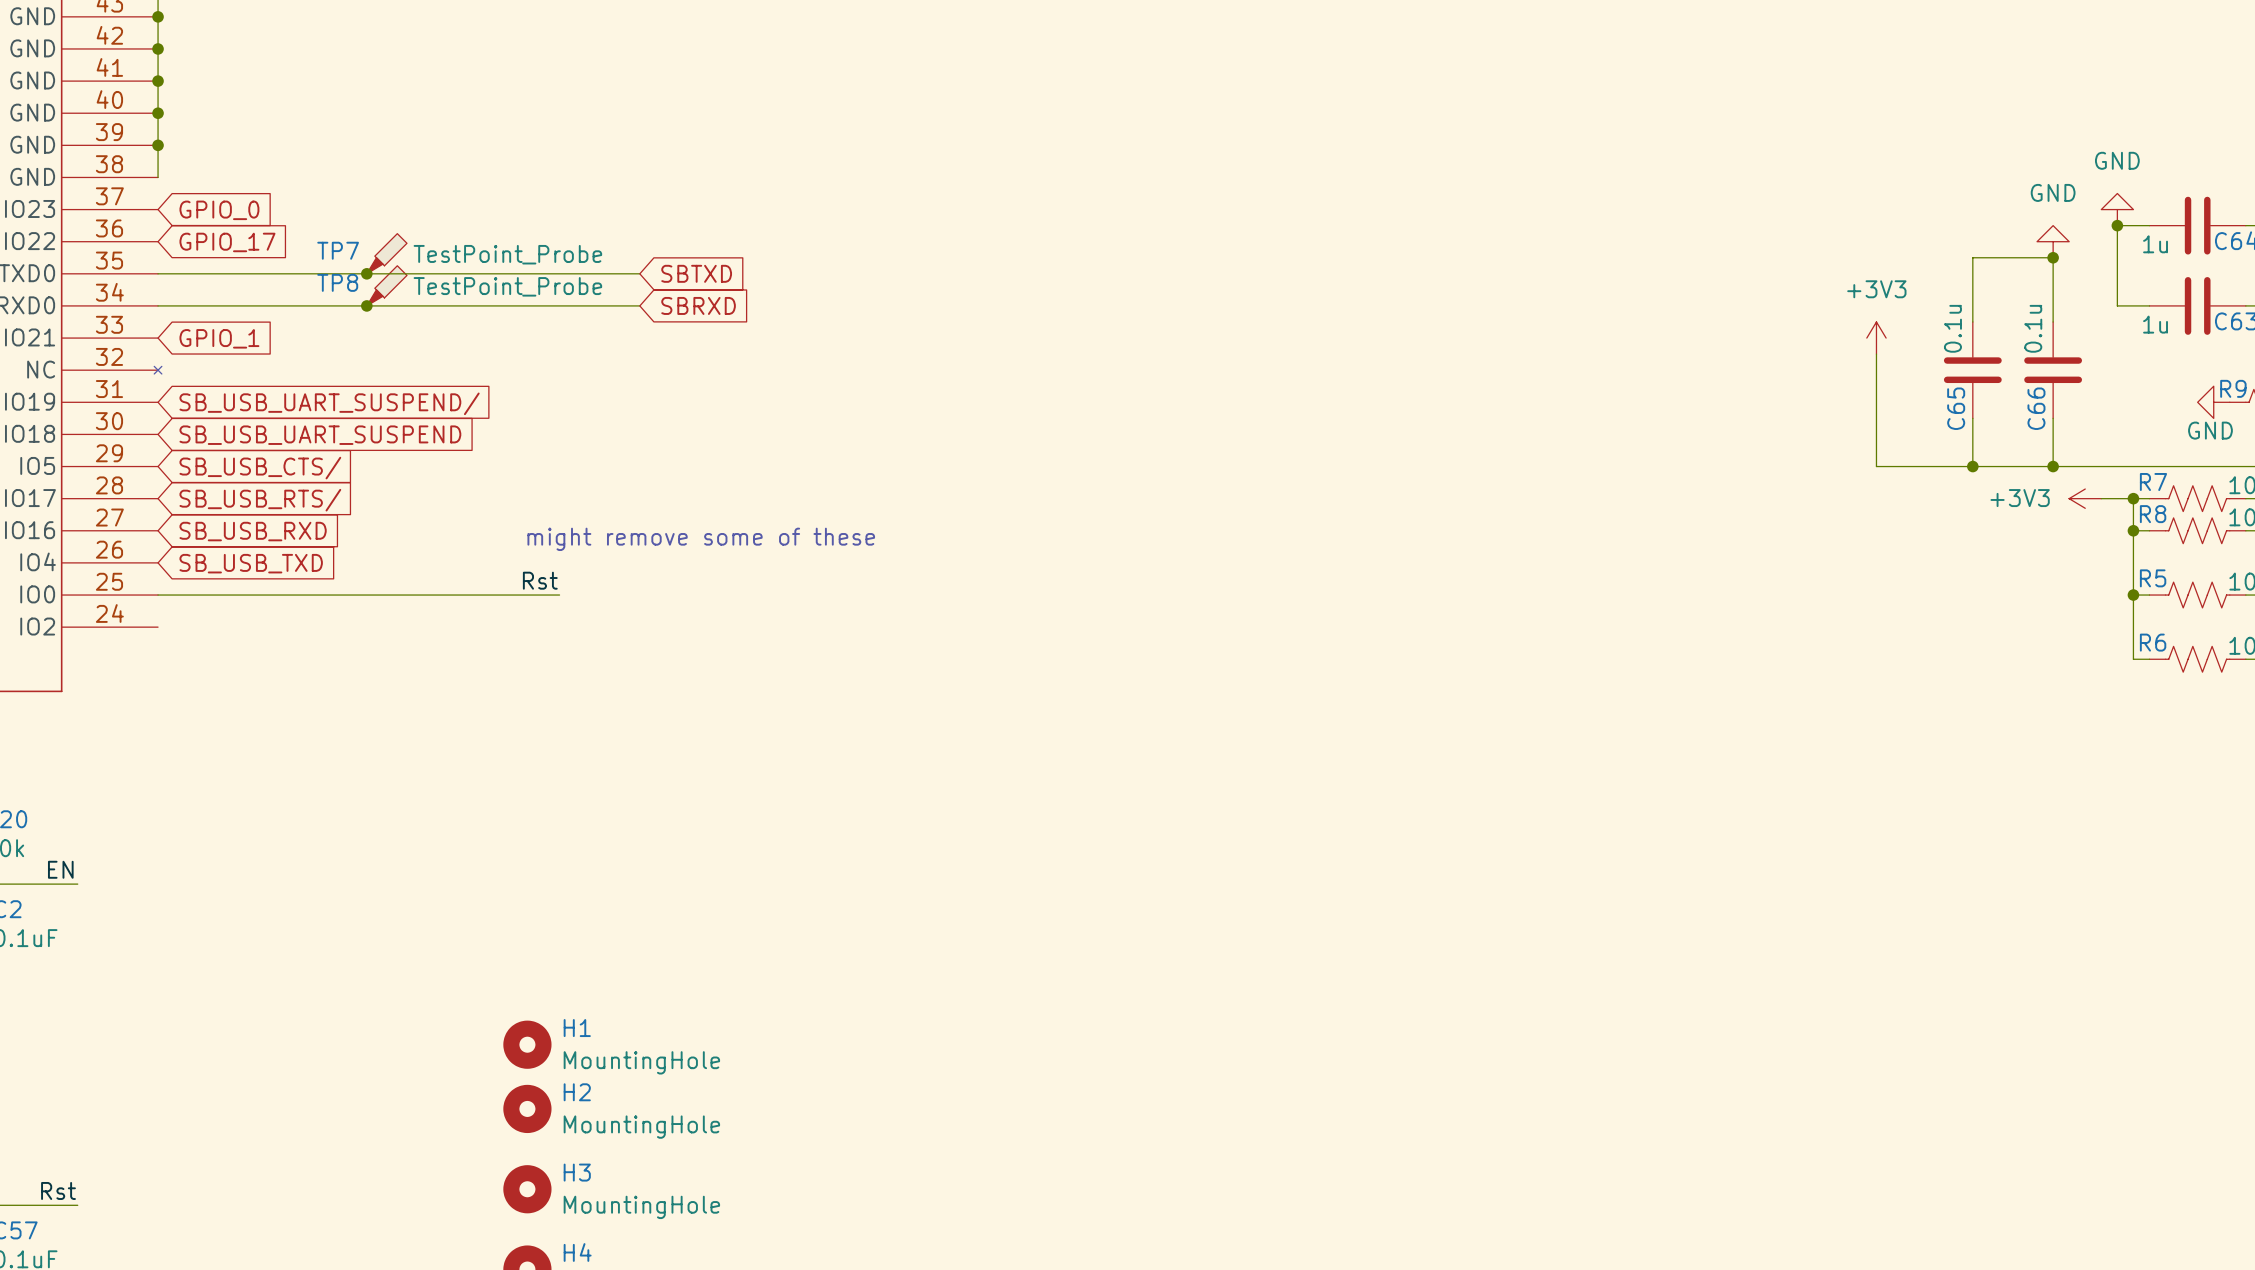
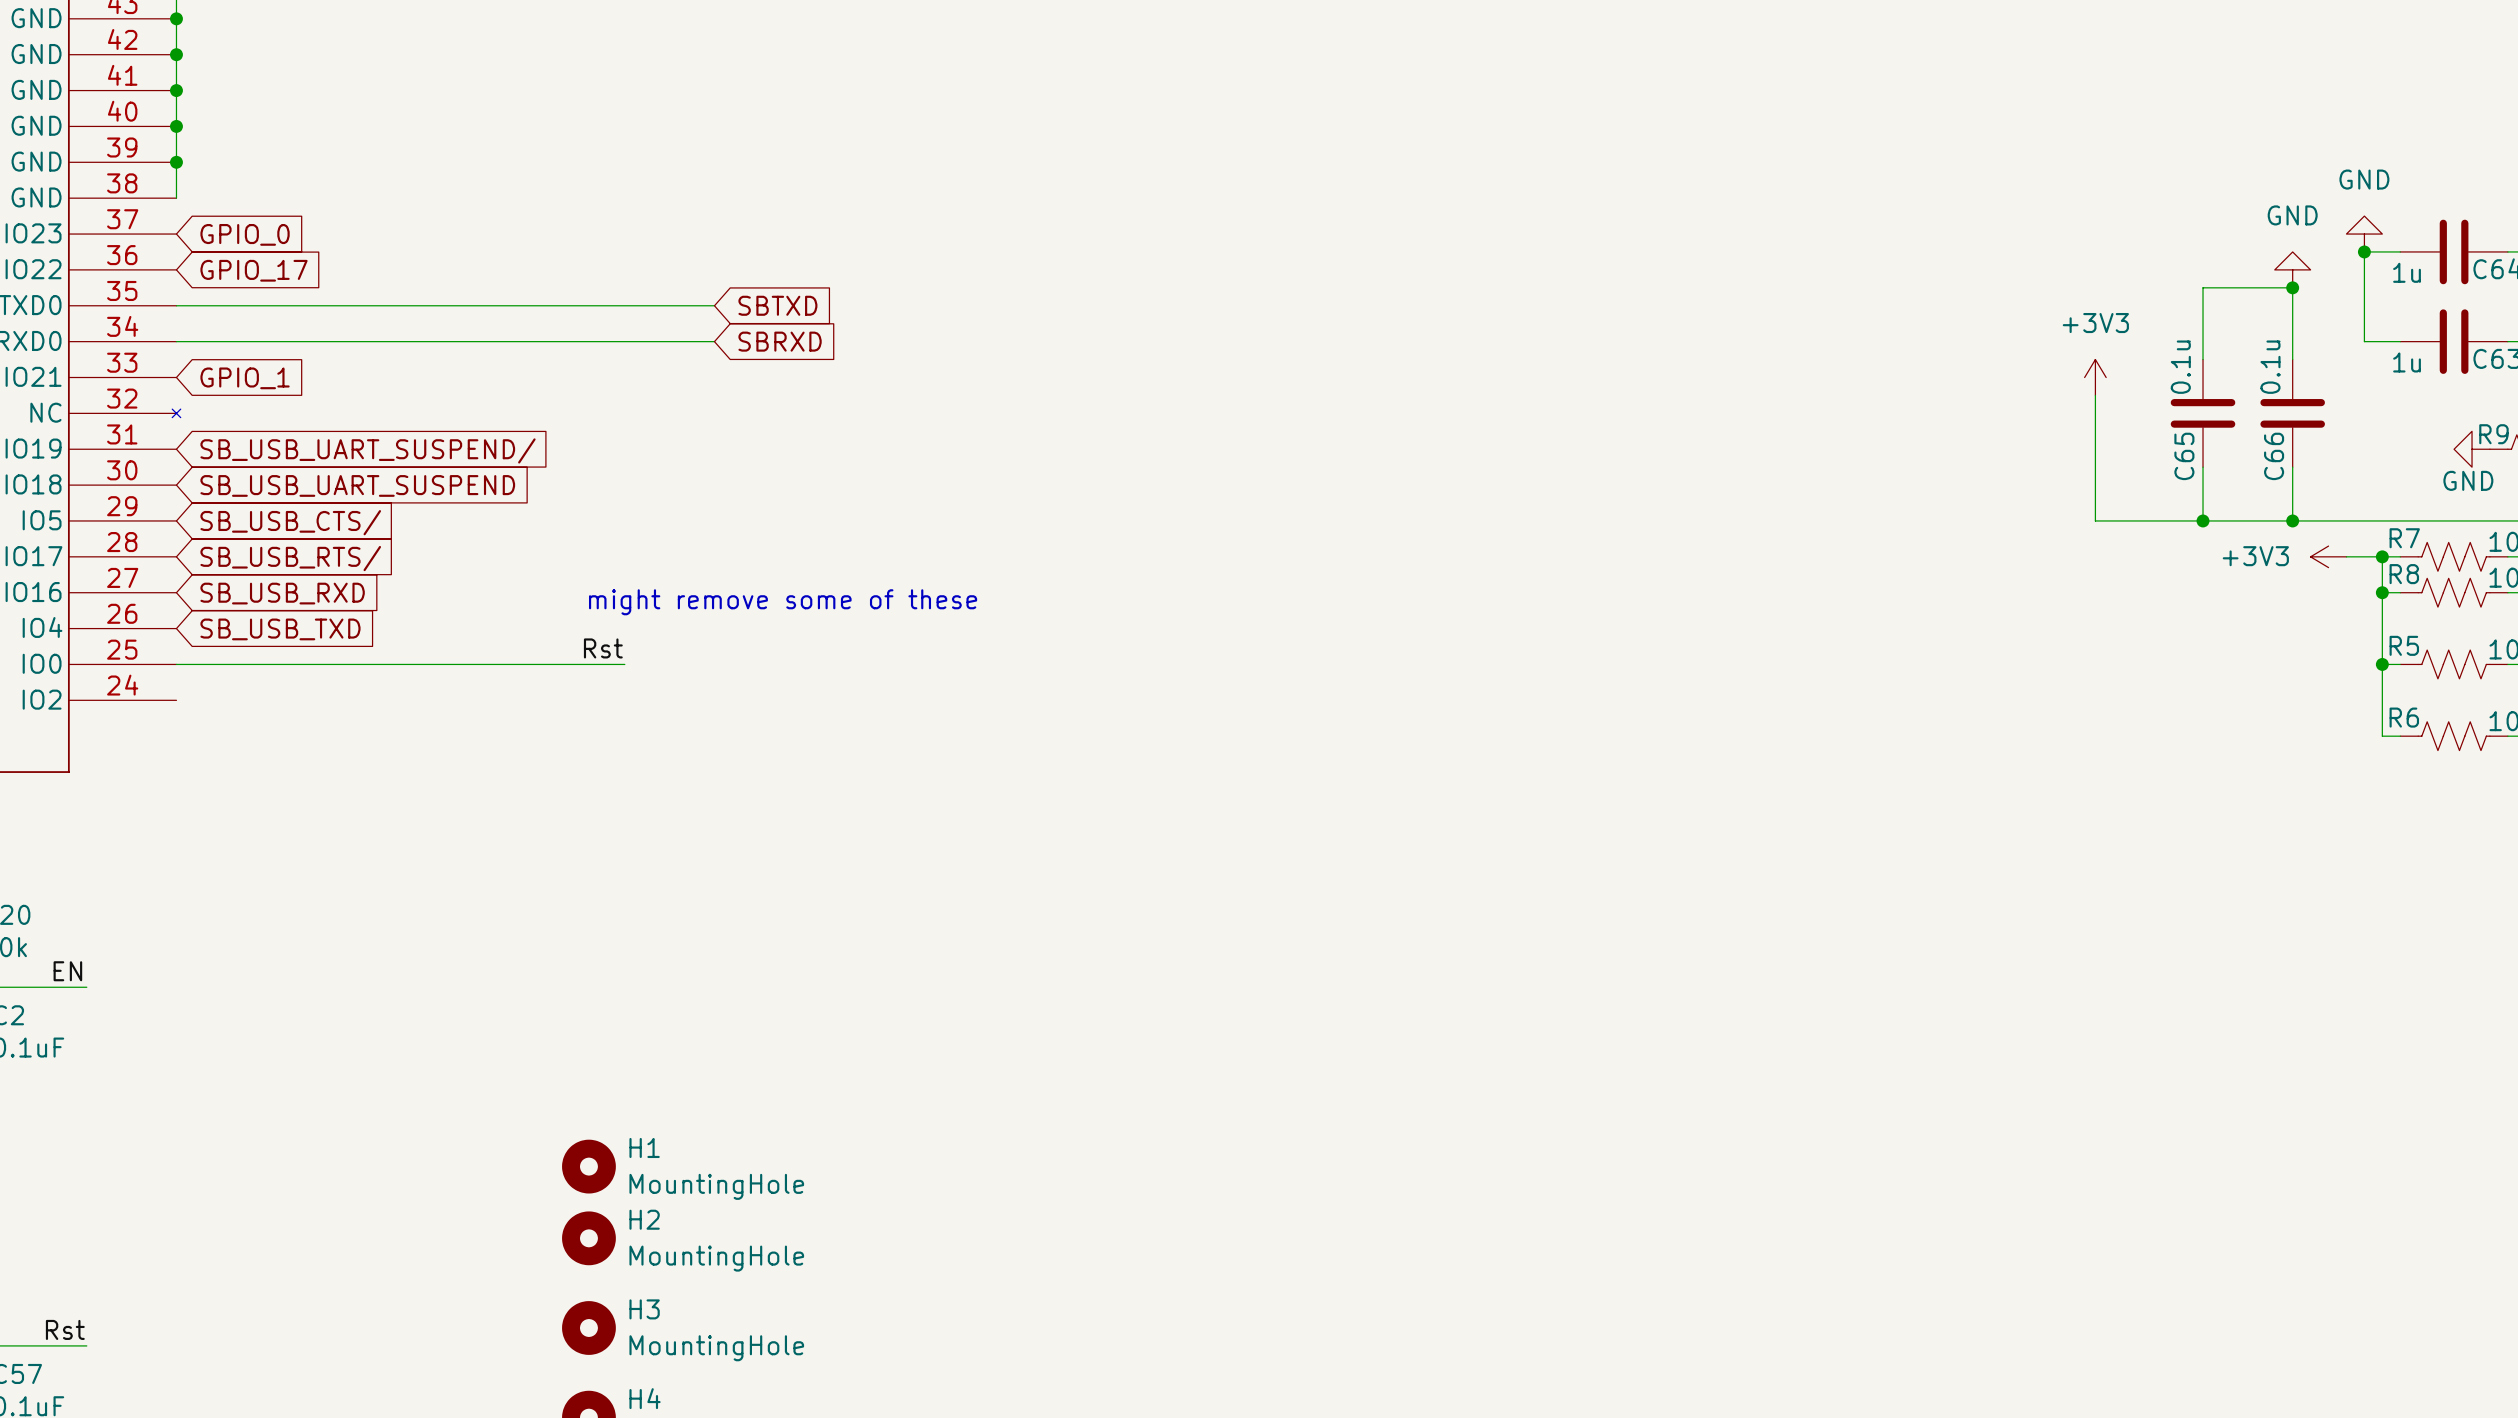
TP7: TestPoint_Probe (386, 253) -> none
junction: (366, 273) -> none
TP8: TestPoint_Probe (386, 285) -> none
junction: (366, 305) -> none

